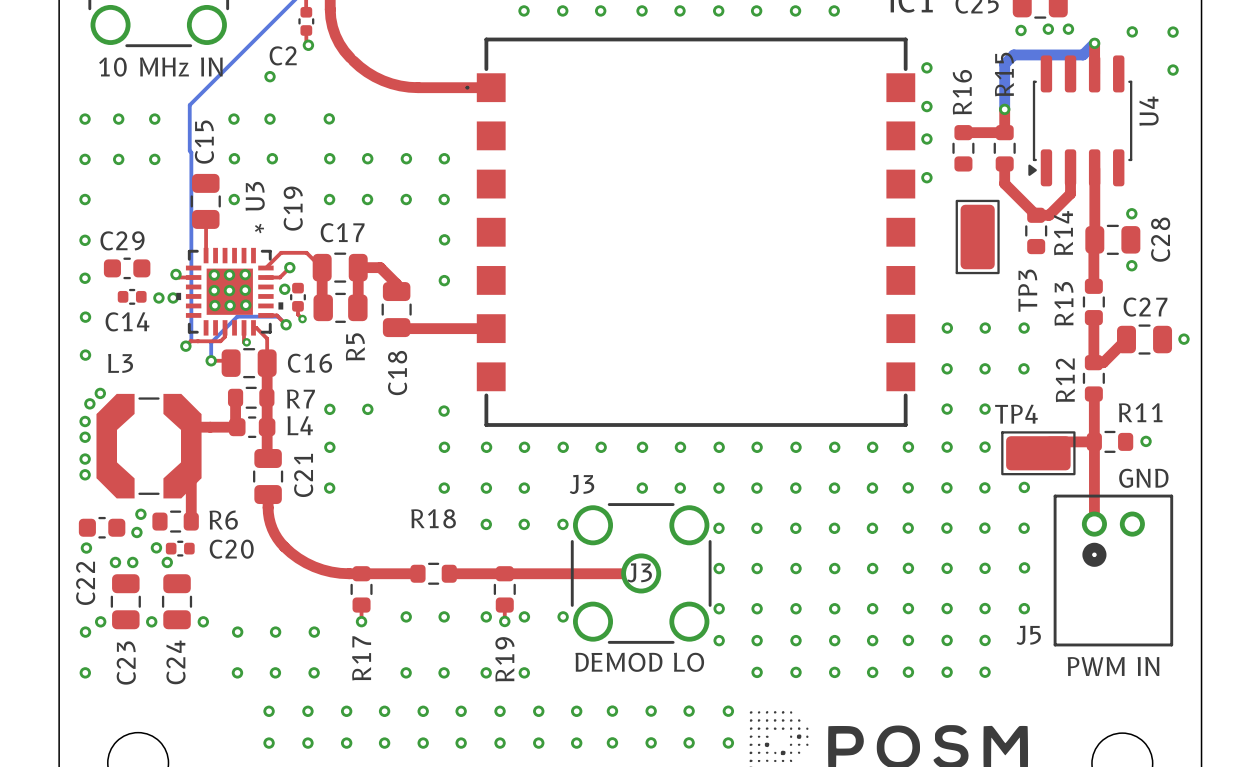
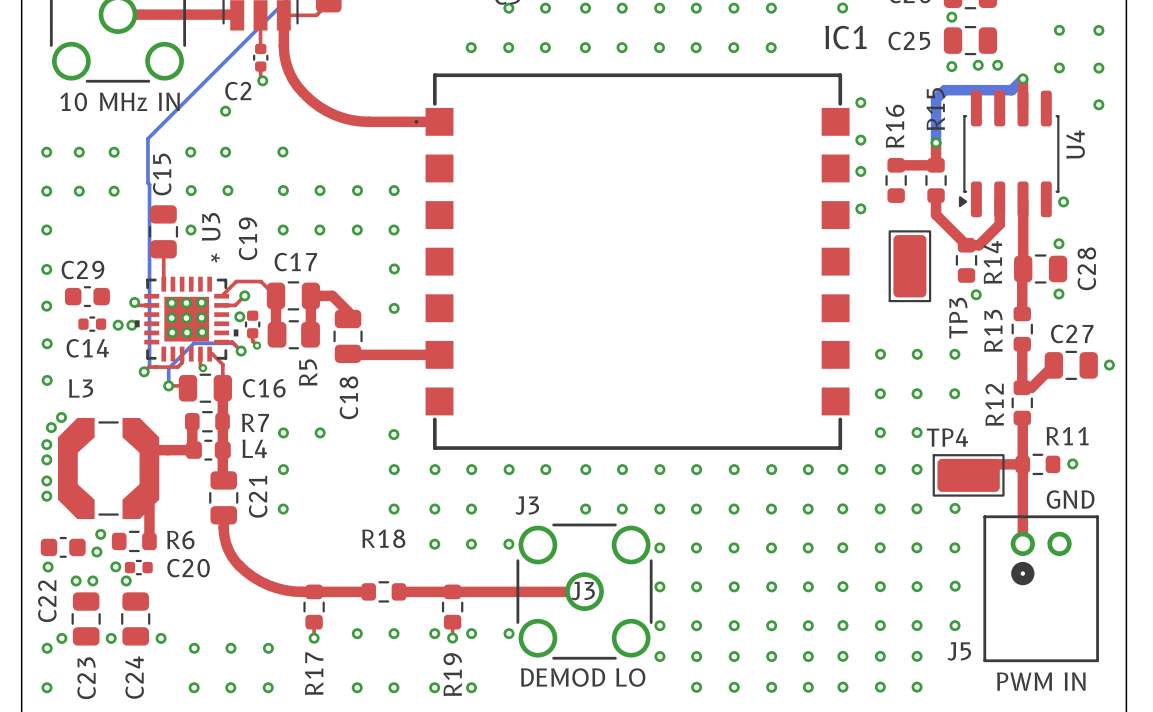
via: none -> (1063, 201)
via: none -> (976, 294)

